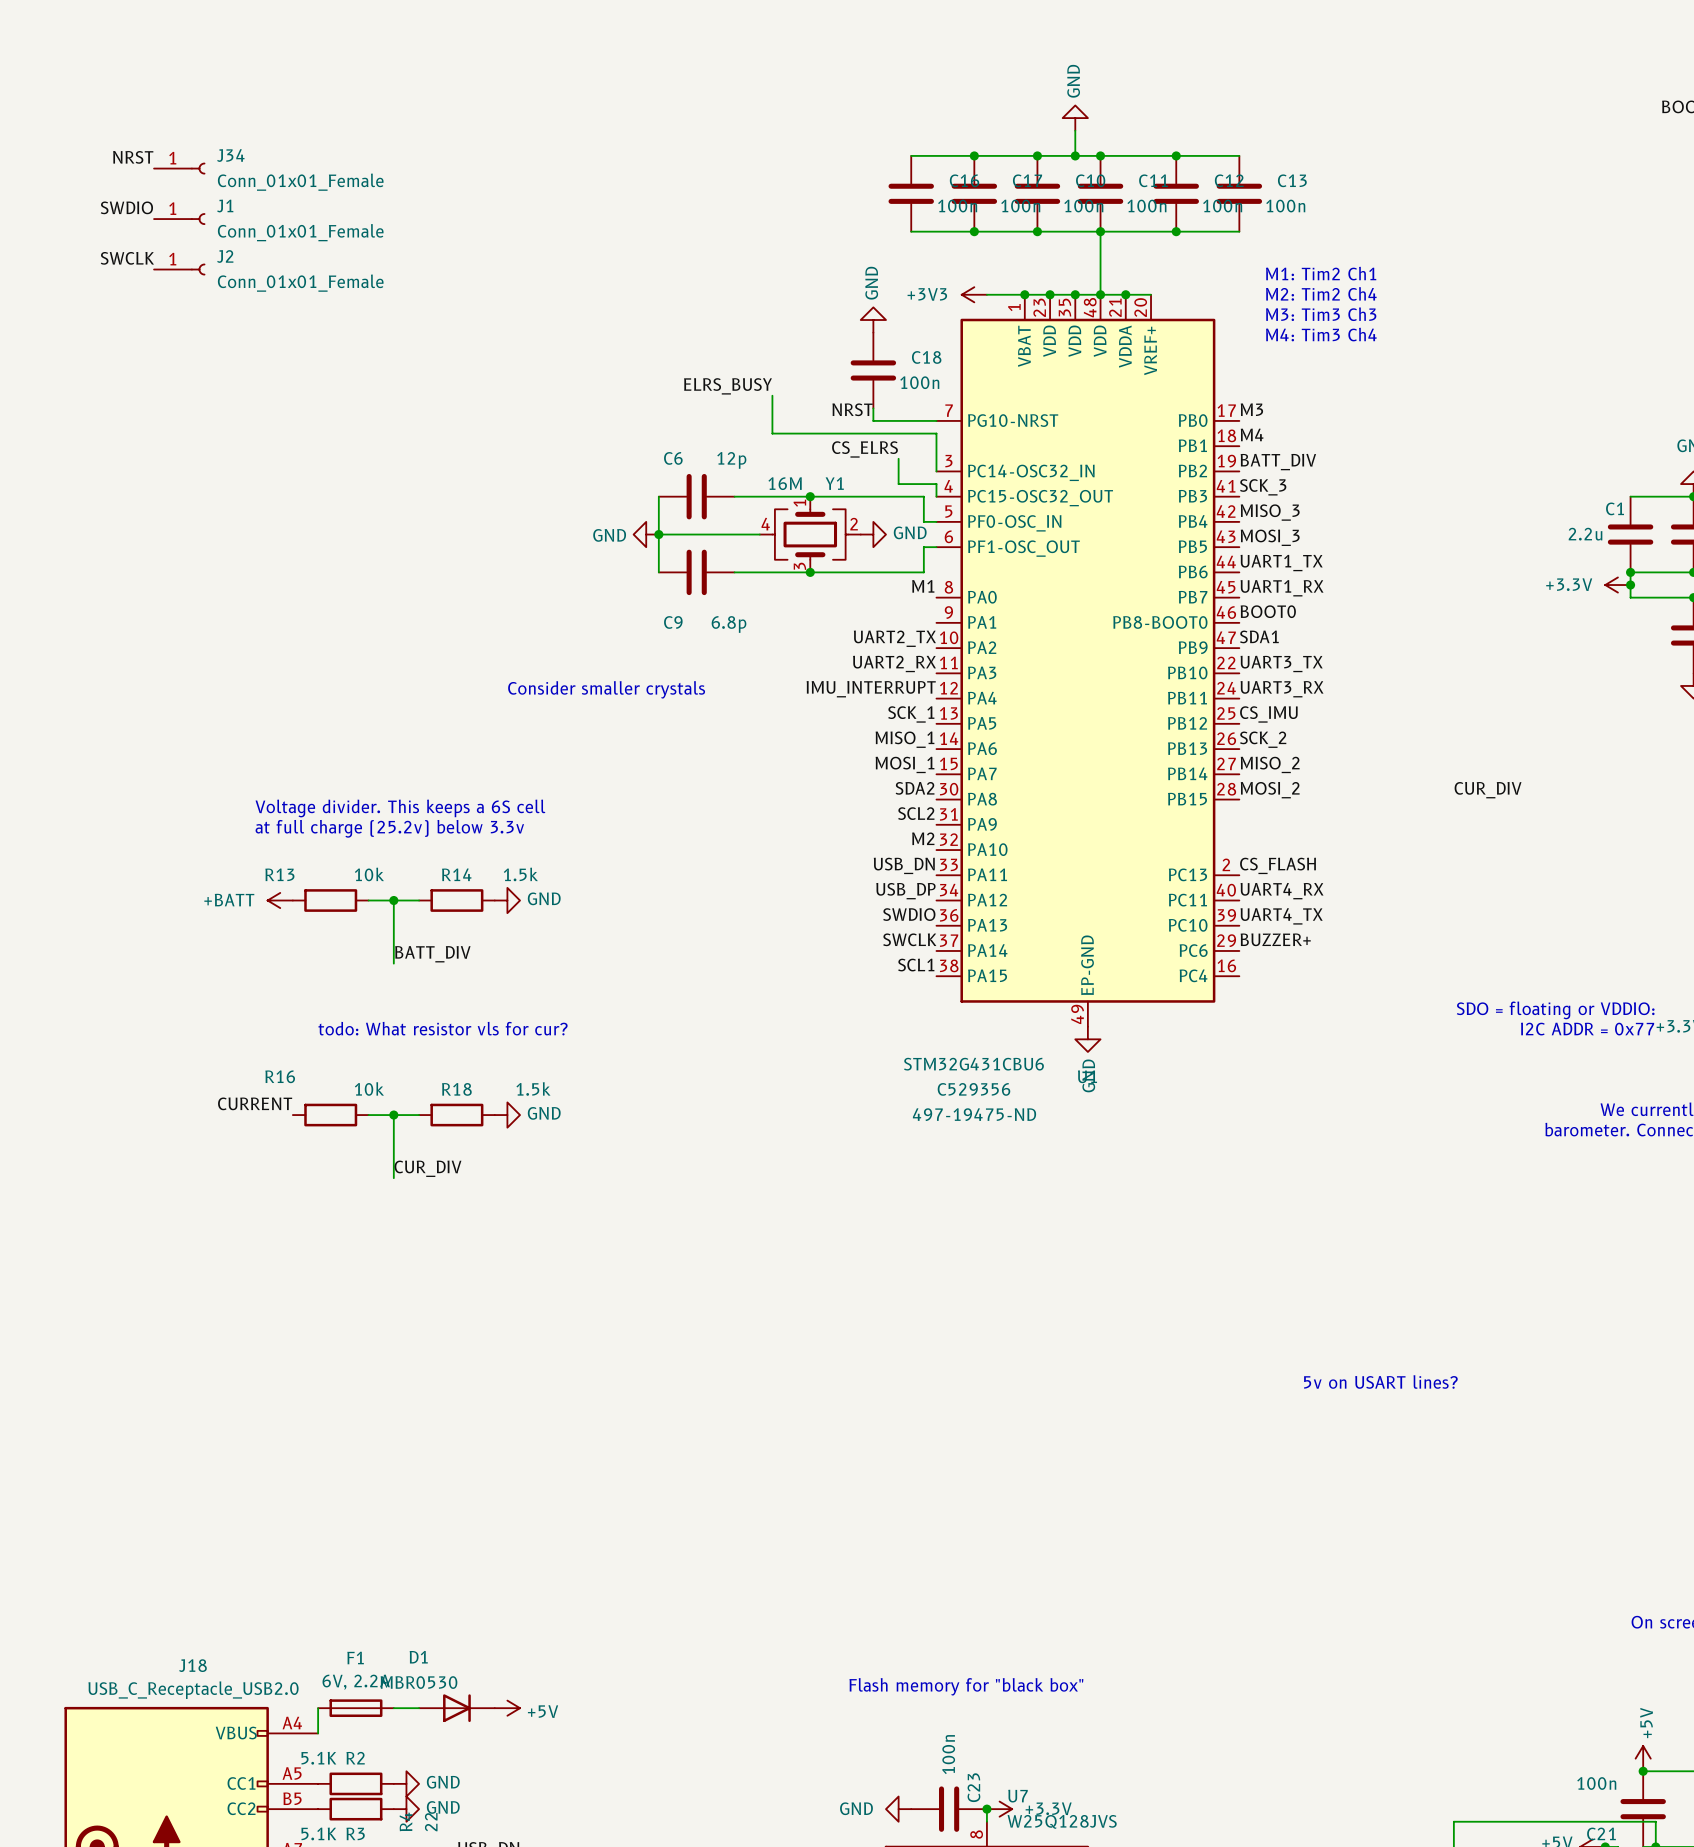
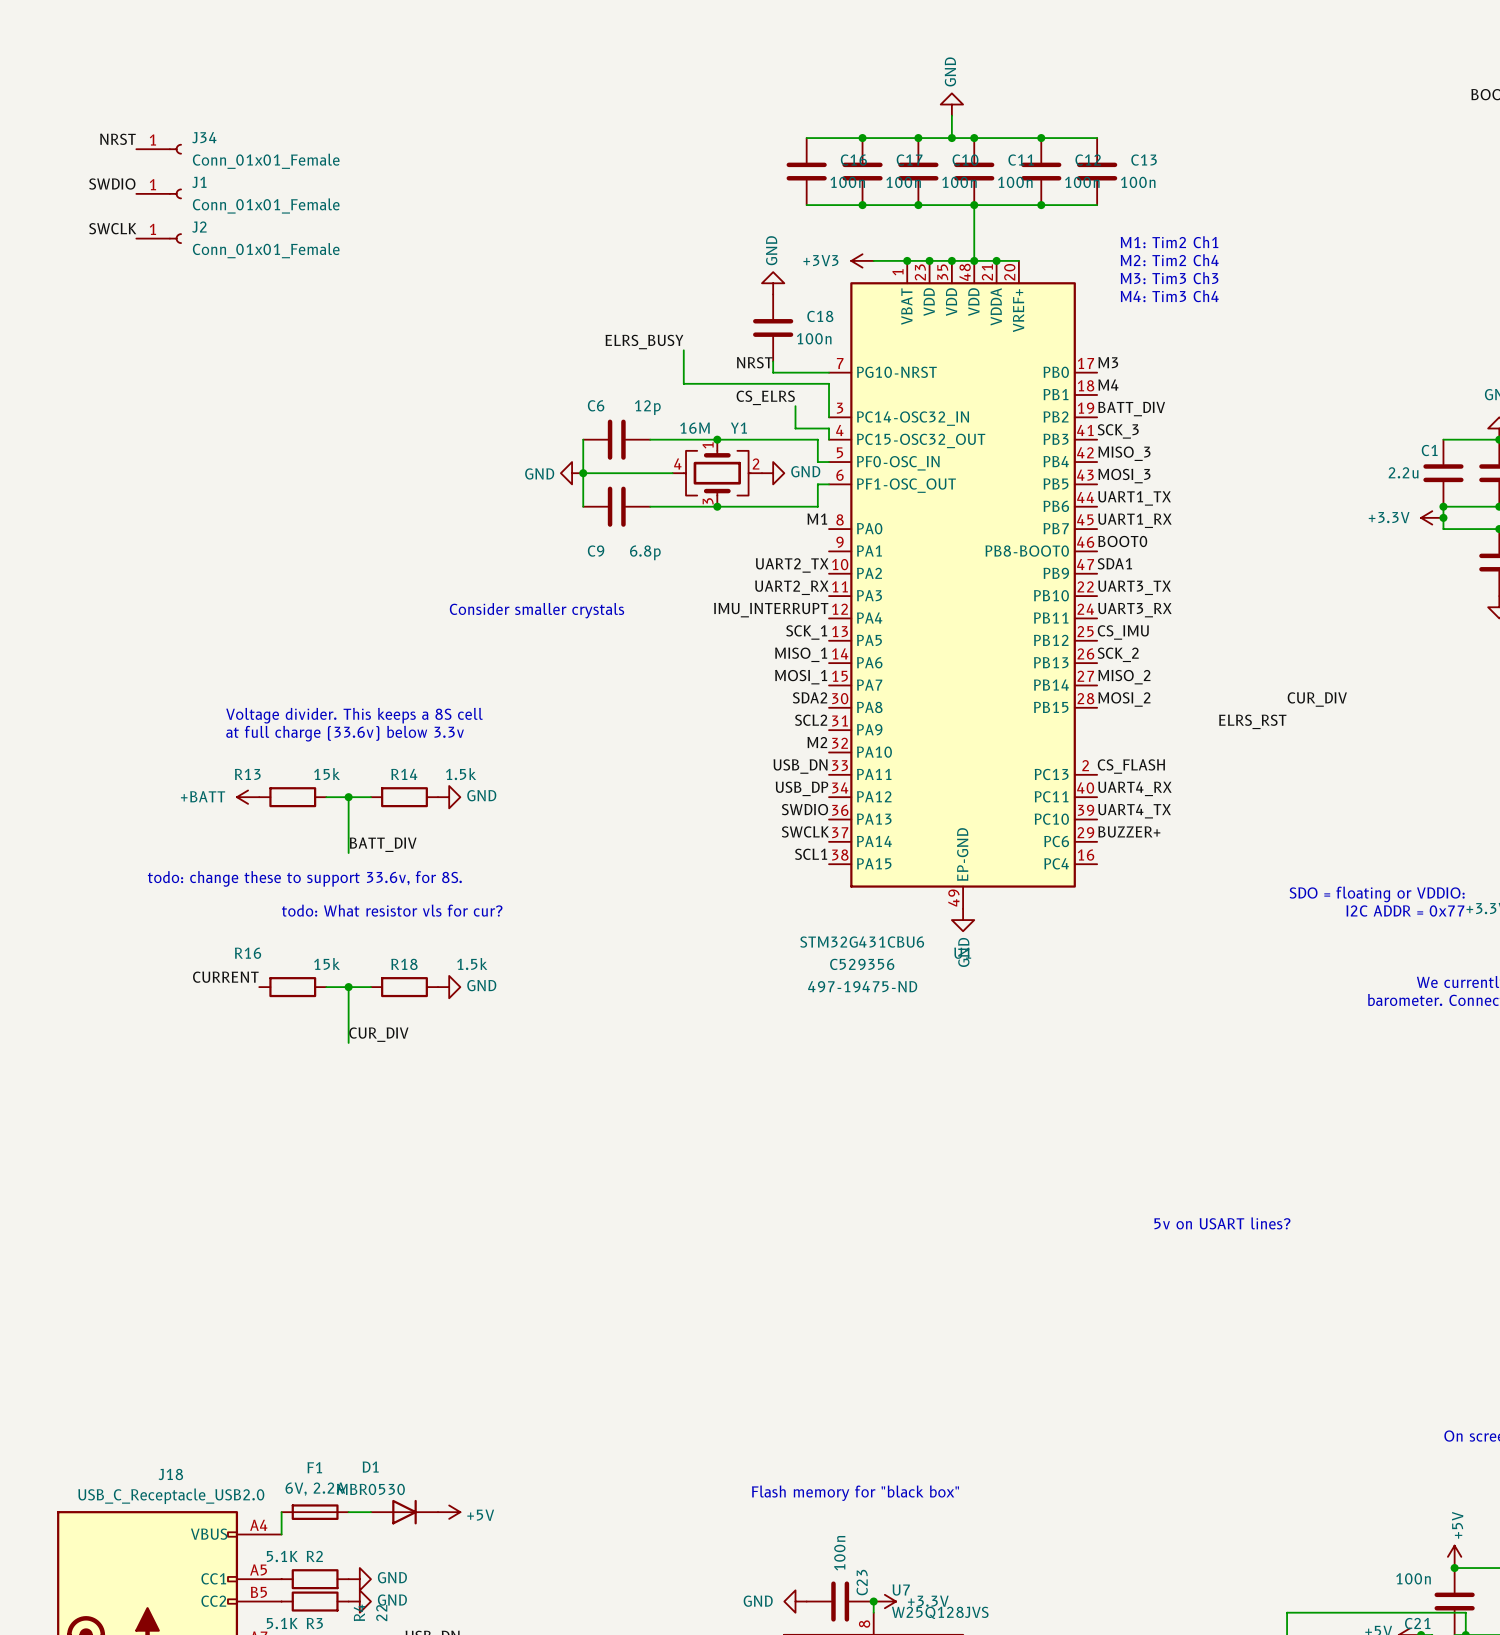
text: Voltage divider. This keeps a 6S cell (400, 808) -> Voltage divider. This keeps a 8S cell (354, 715)
label: none -> ELRS_RST (1252, 721)
text: at full charge (25.2v) below 3.3v (389, 828) -> at full charge (33.6v) below 3.3v (345, 733)
R13 value: 10k (369, 874) -> 15k (327, 774)
text: none -> todo: change these to support 33.6v, for 8S. (304, 878)
R16 value: 10k (369, 1088) -> 15k (327, 963)

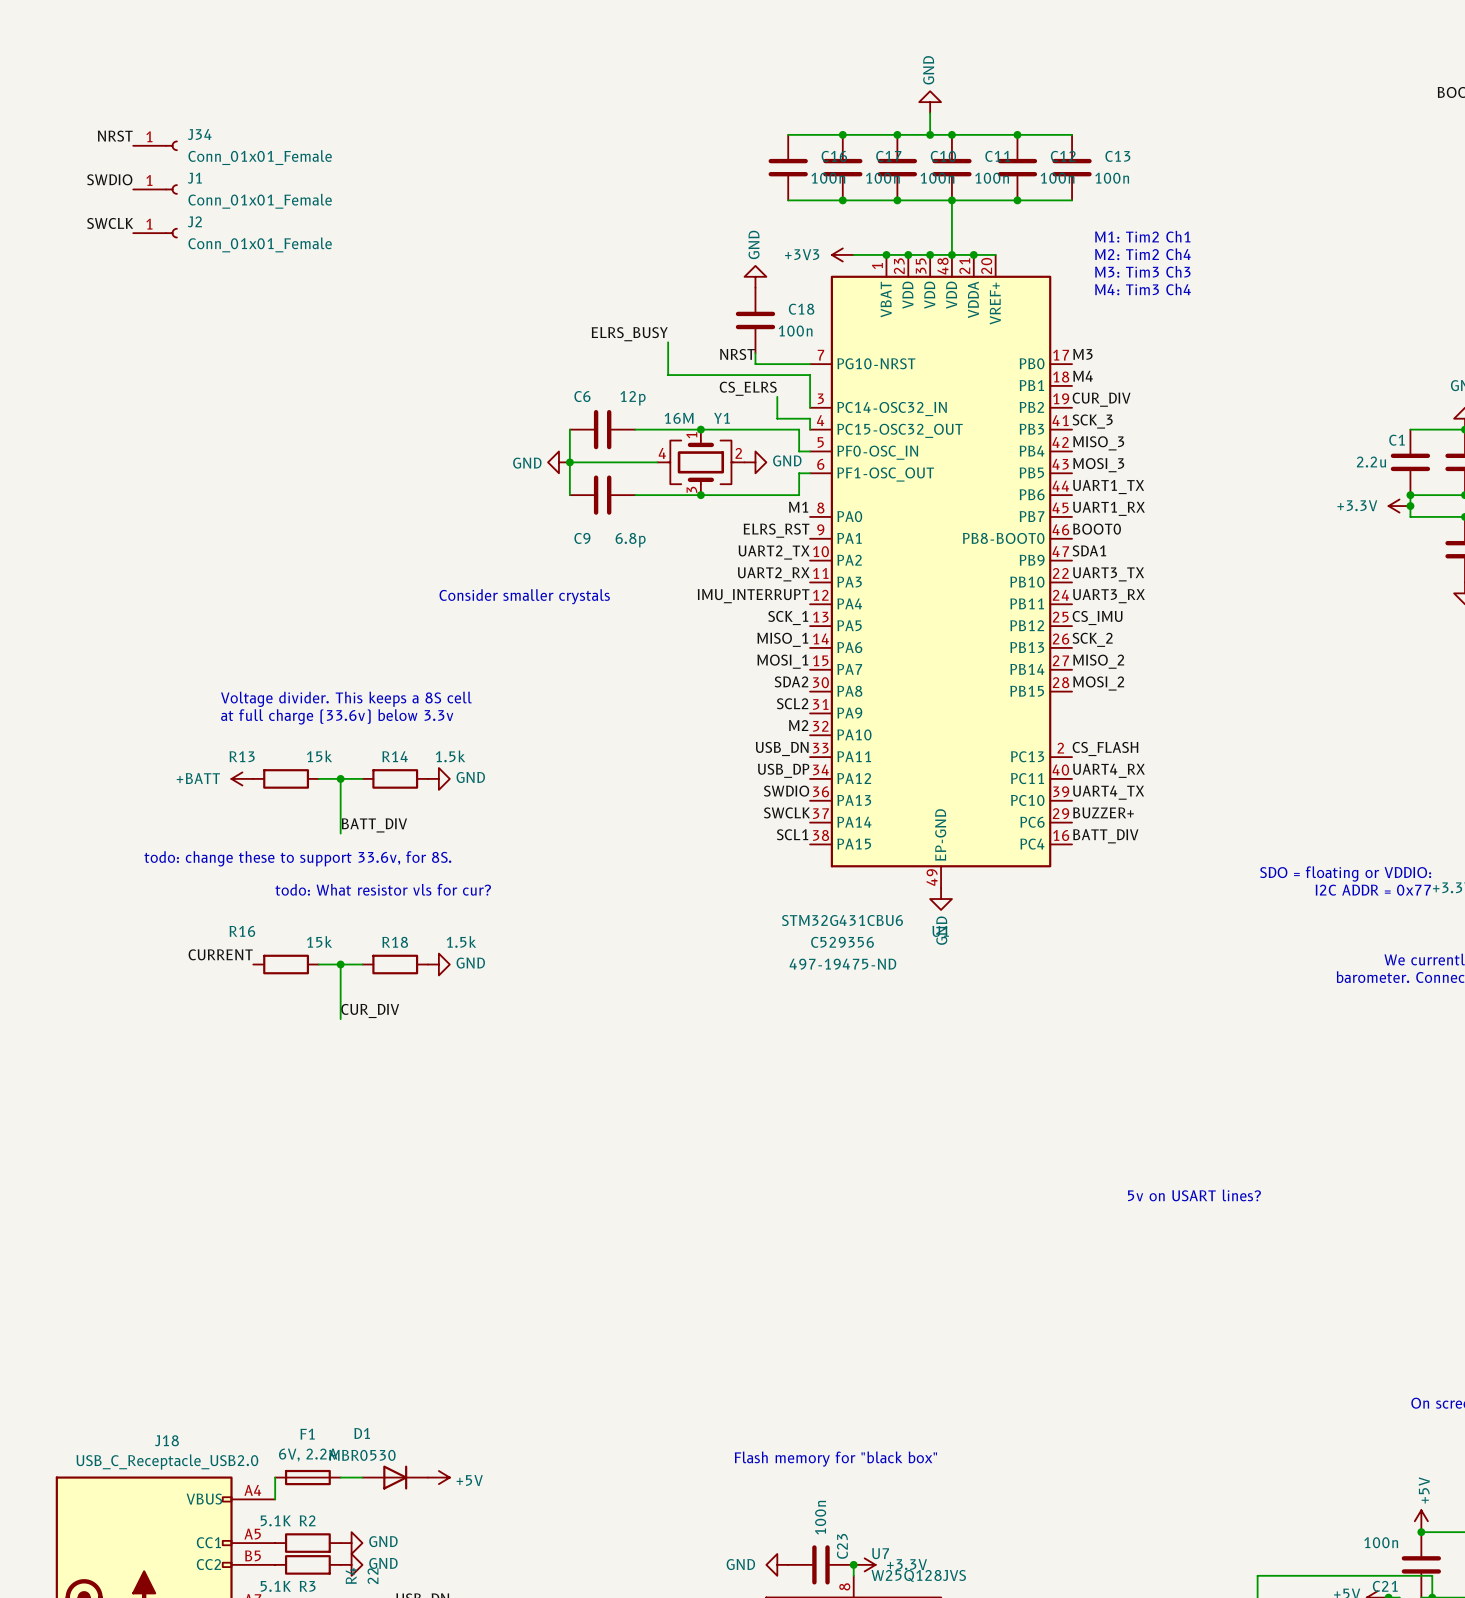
label: BATT_DIV (1131, 409) -> CUR_DIV (1101, 399)
label: none -> ELRS_RST (776, 530)
label: CUR_DIV (1317, 699) -> none
label: ELRS_RST (1252, 721) -> none
label: none -> BATT_DIV (1105, 836)

